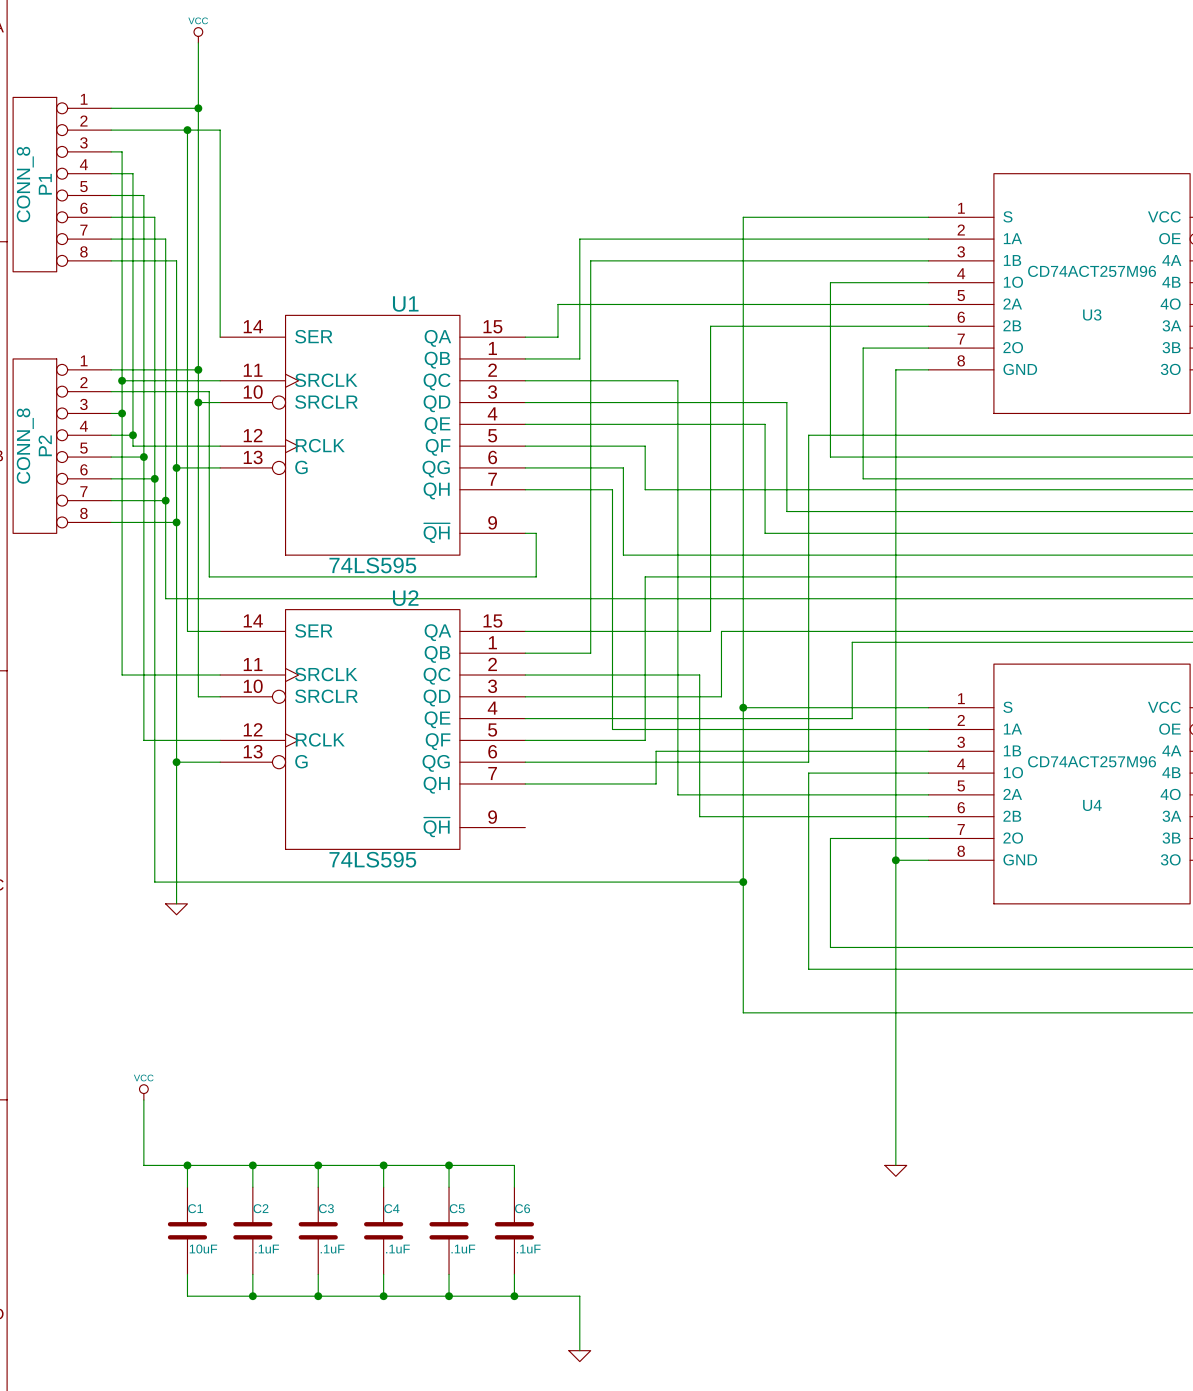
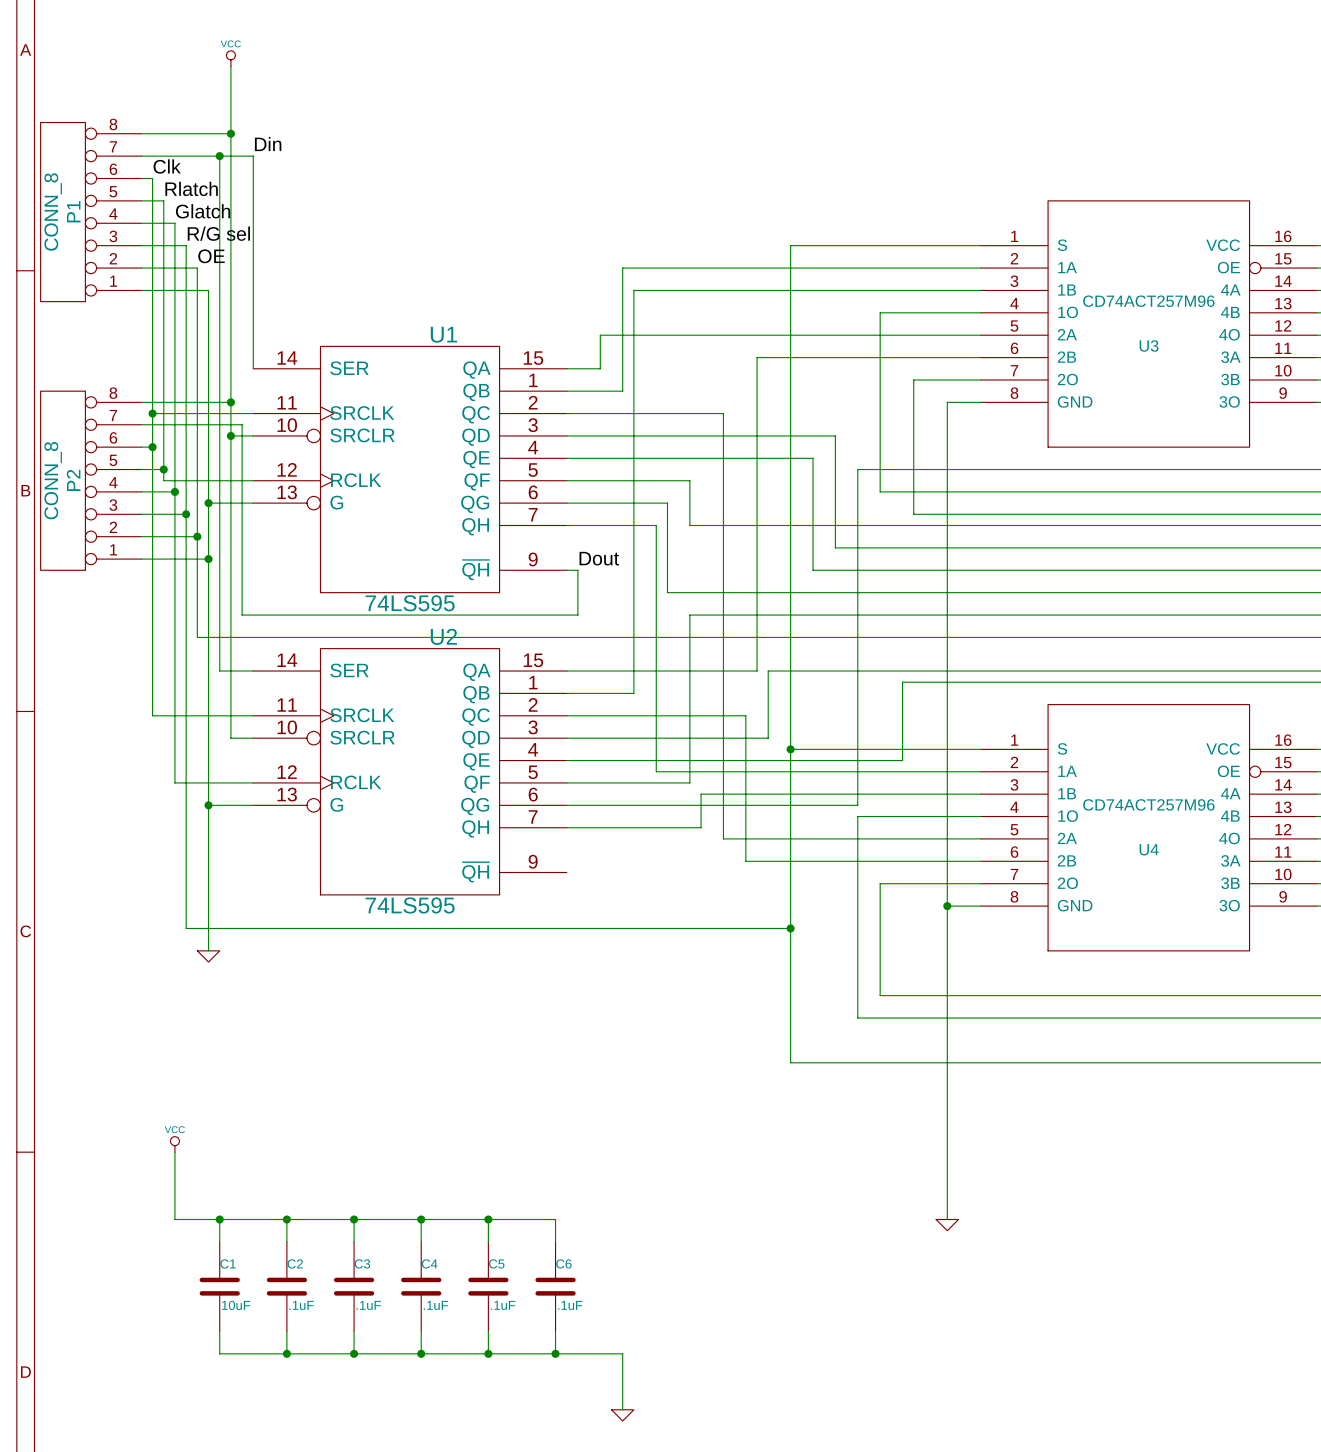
label: none -> Din (268, 144)
label: none -> Clk (167, 166)
label: none -> Rlatch (191, 188)
label: none -> Glatch (203, 211)
P1 flip: as is (34, 184) -> up-down (63, 212)
label: none -> R/G sel (218, 233)
label: none -> OE (211, 256)
P2 flip: as is (34, 446) -> up-down (63, 480)
label: none -> Dout (599, 558)

